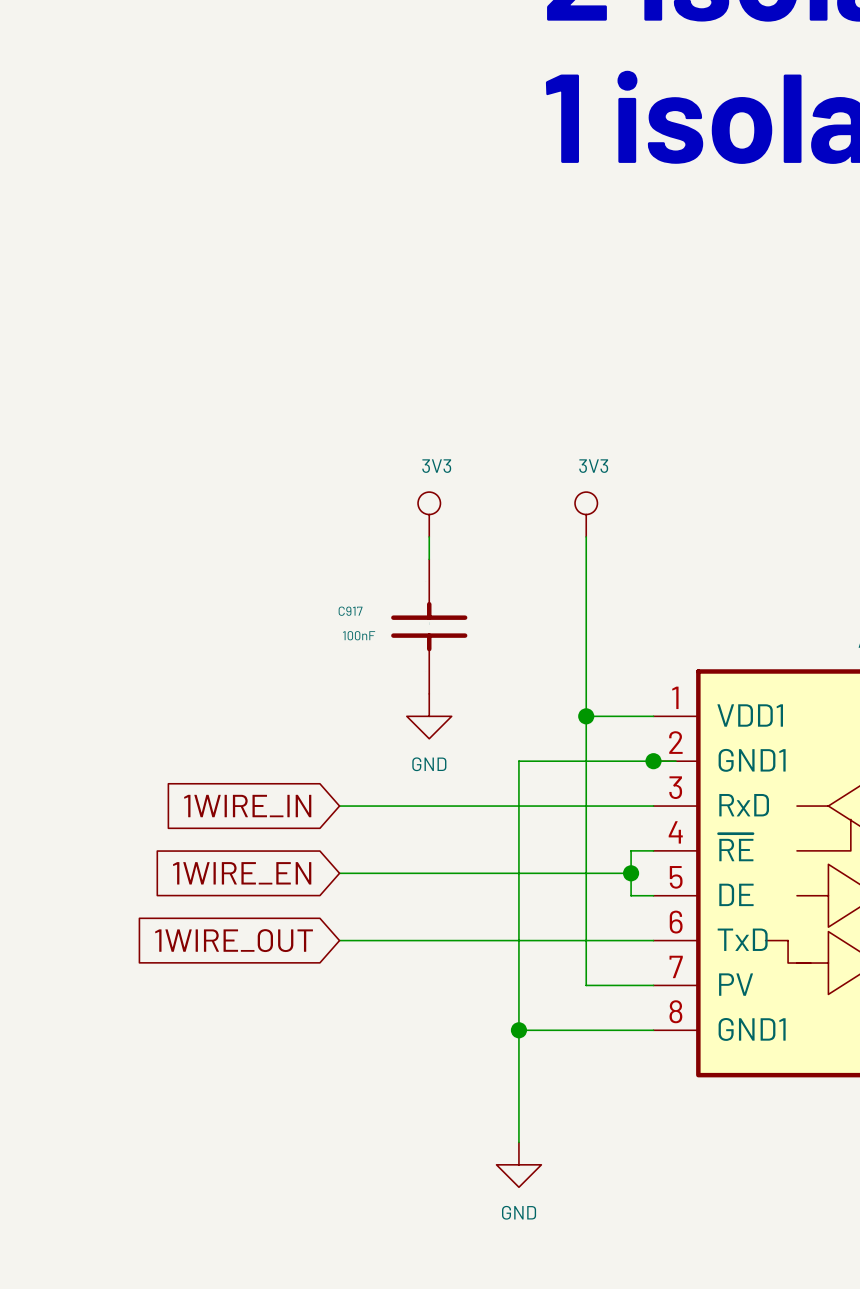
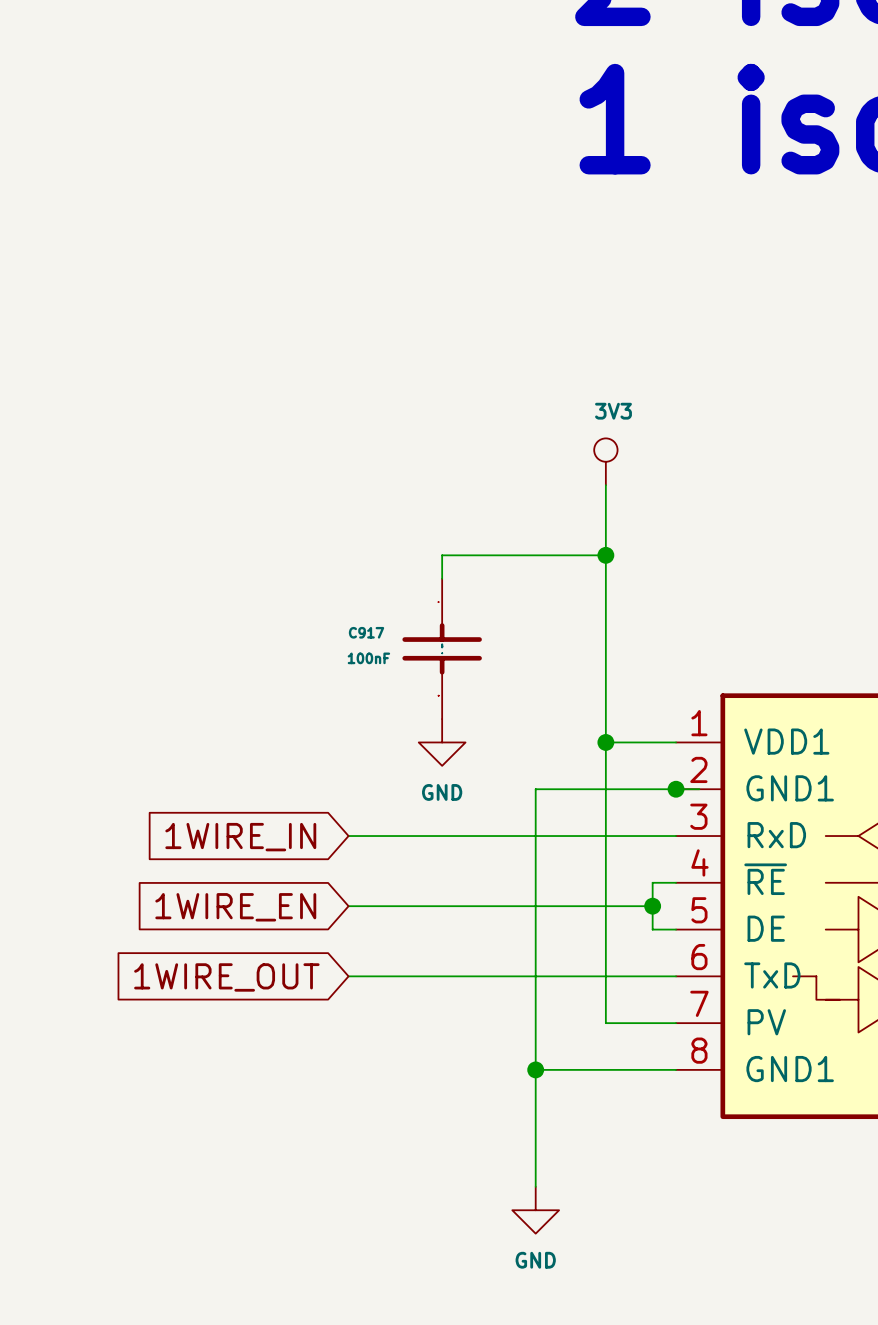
wire: none -> (605, 485) (605, 555) (442, 555)
power symbol: 3V3 (429, 514) -> none
power symbol position: 3V3 (586, 514) -> 3V3 (605, 461)
junction: none -> (605, 555)

